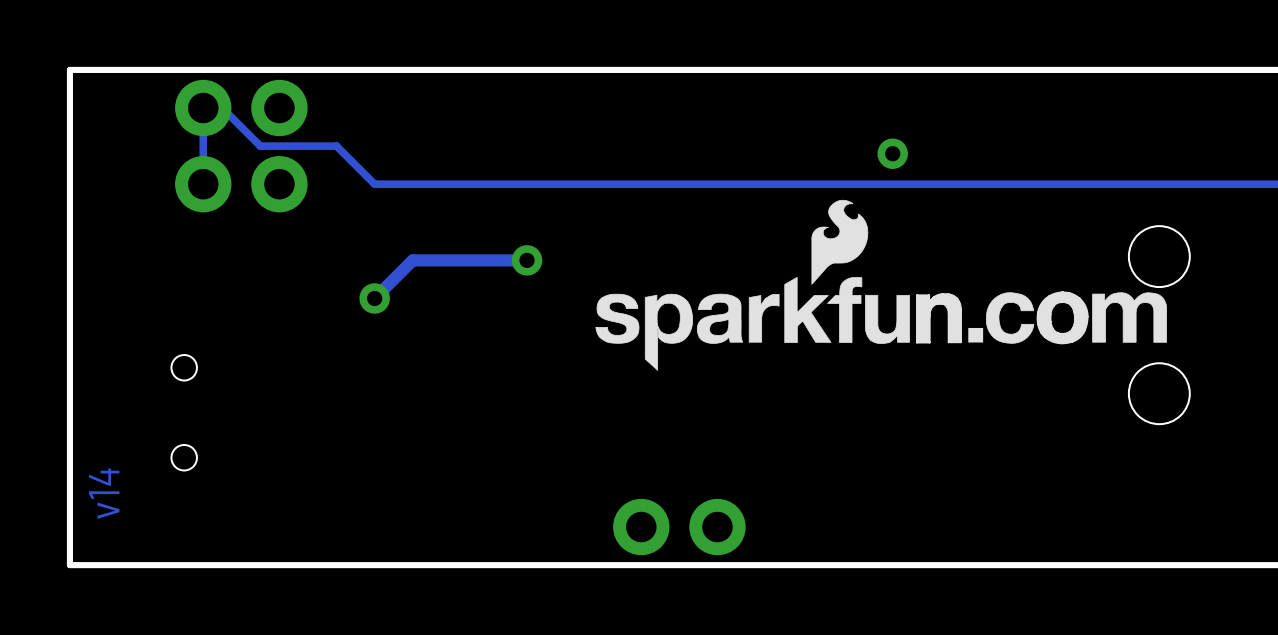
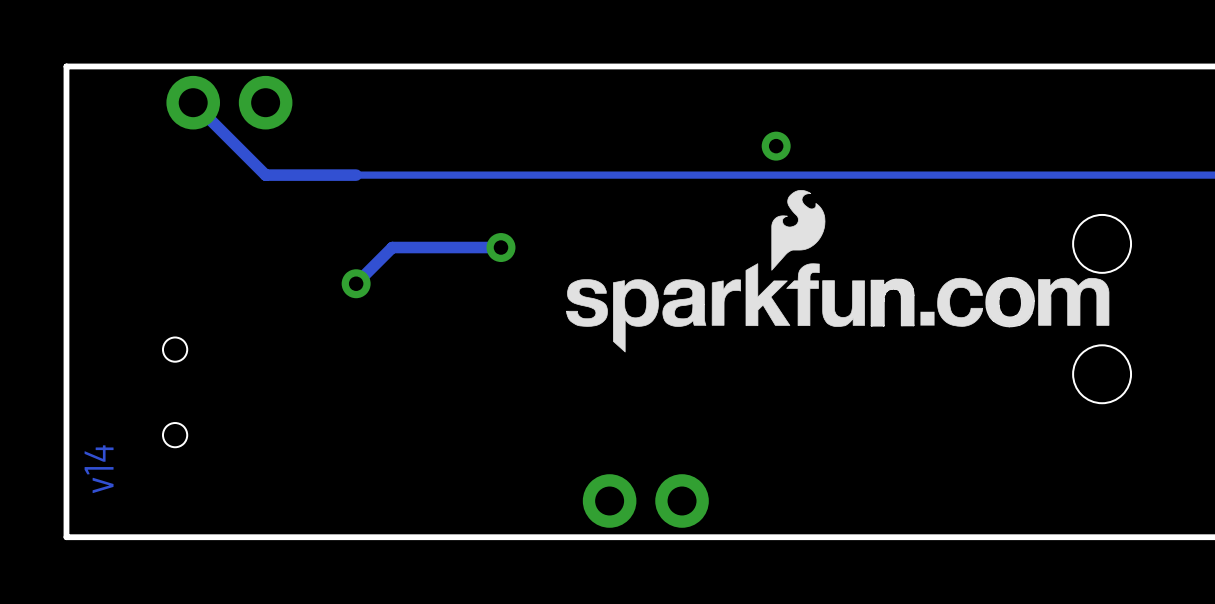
via position: (892, 153) -> (776, 146)
part: (203, 184) -> none
part: (279, 184) -> none
track: (374, 184) (336, 146) (260, 146) (222, 108) (203, 108) (203, 184) -> (356, 175) (265, 175) (193, 102)

